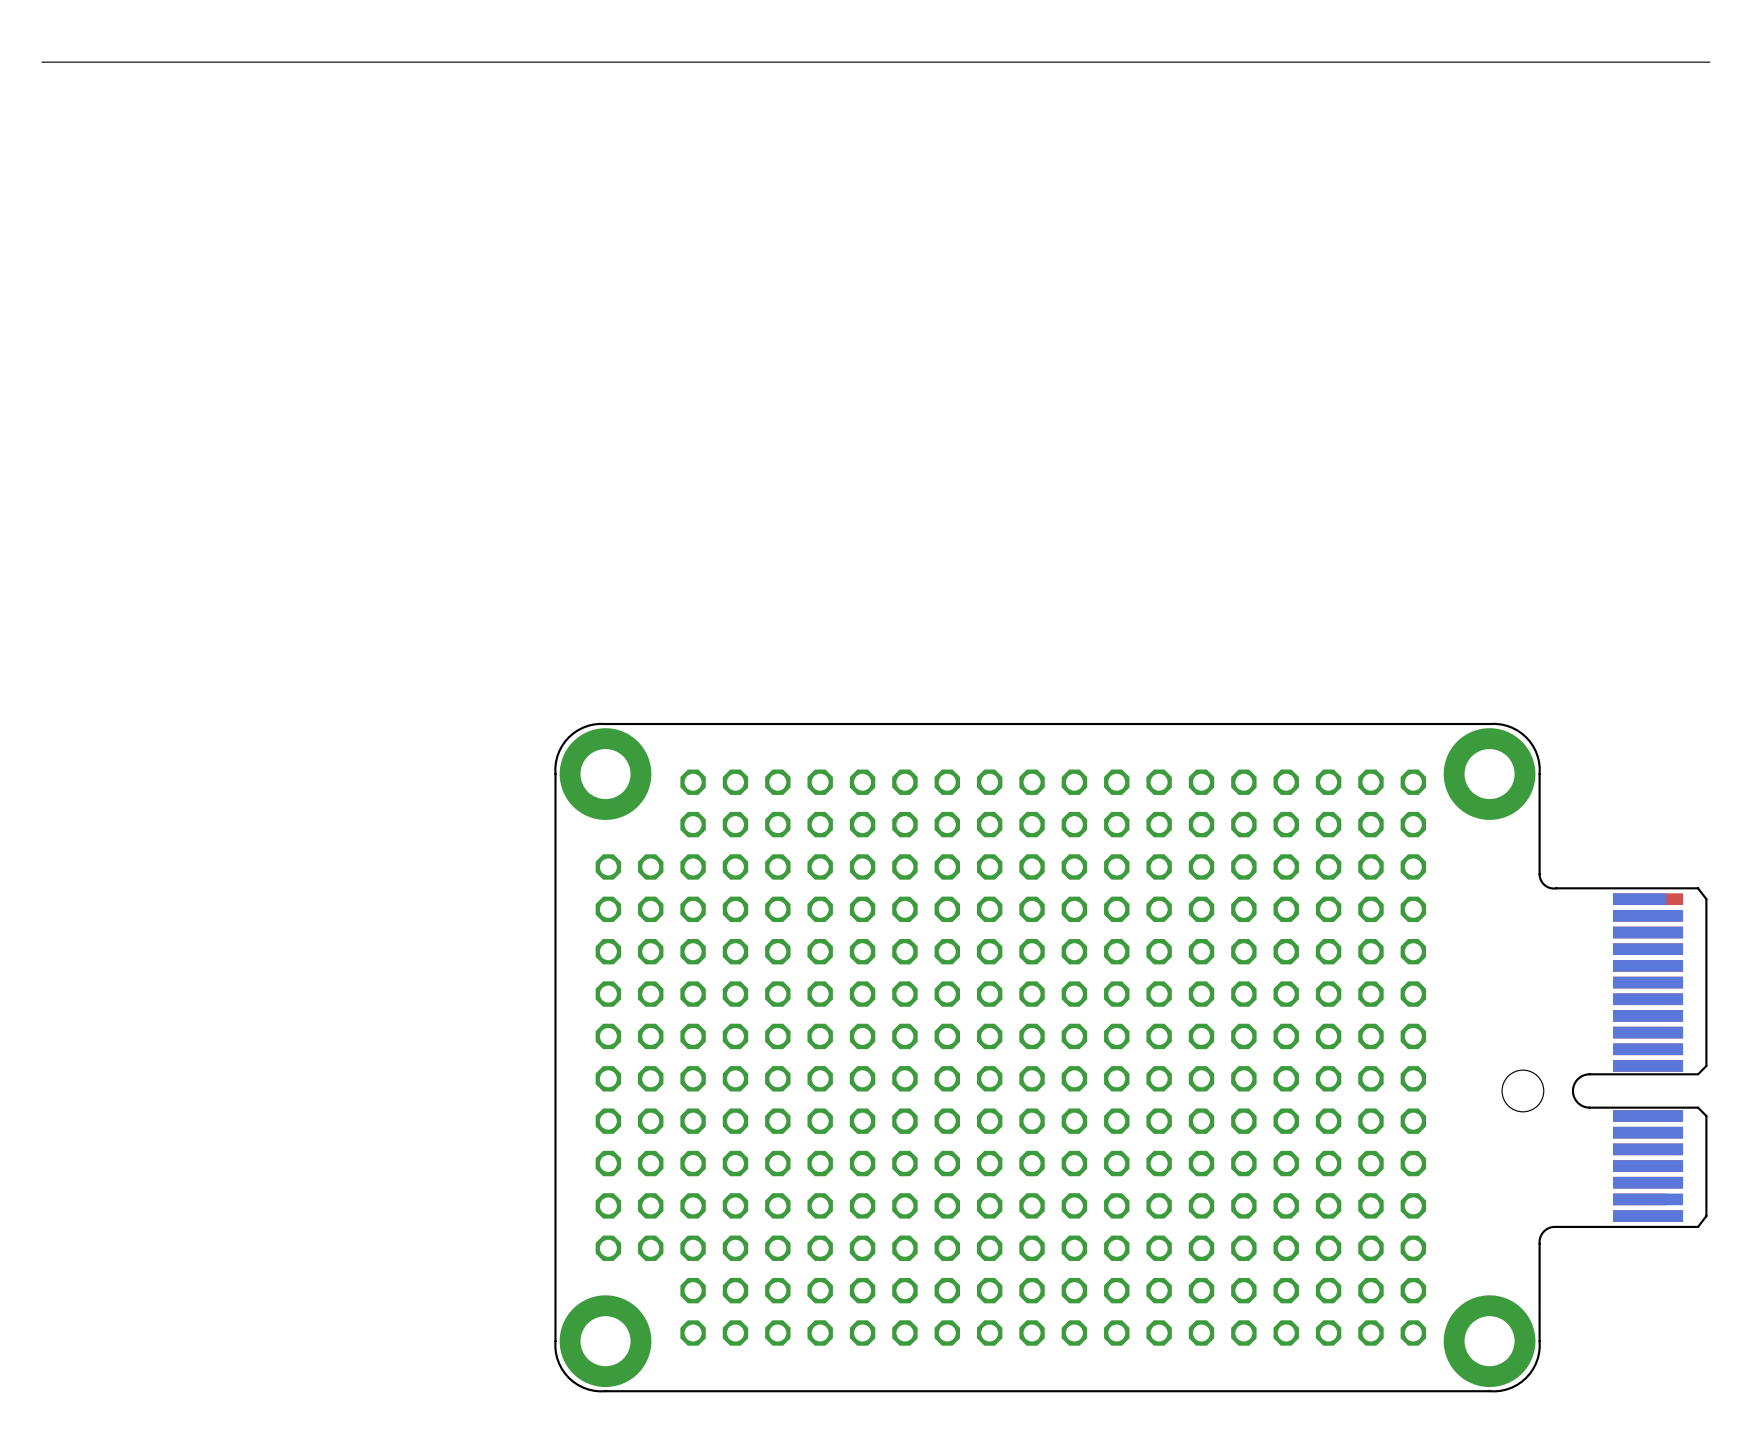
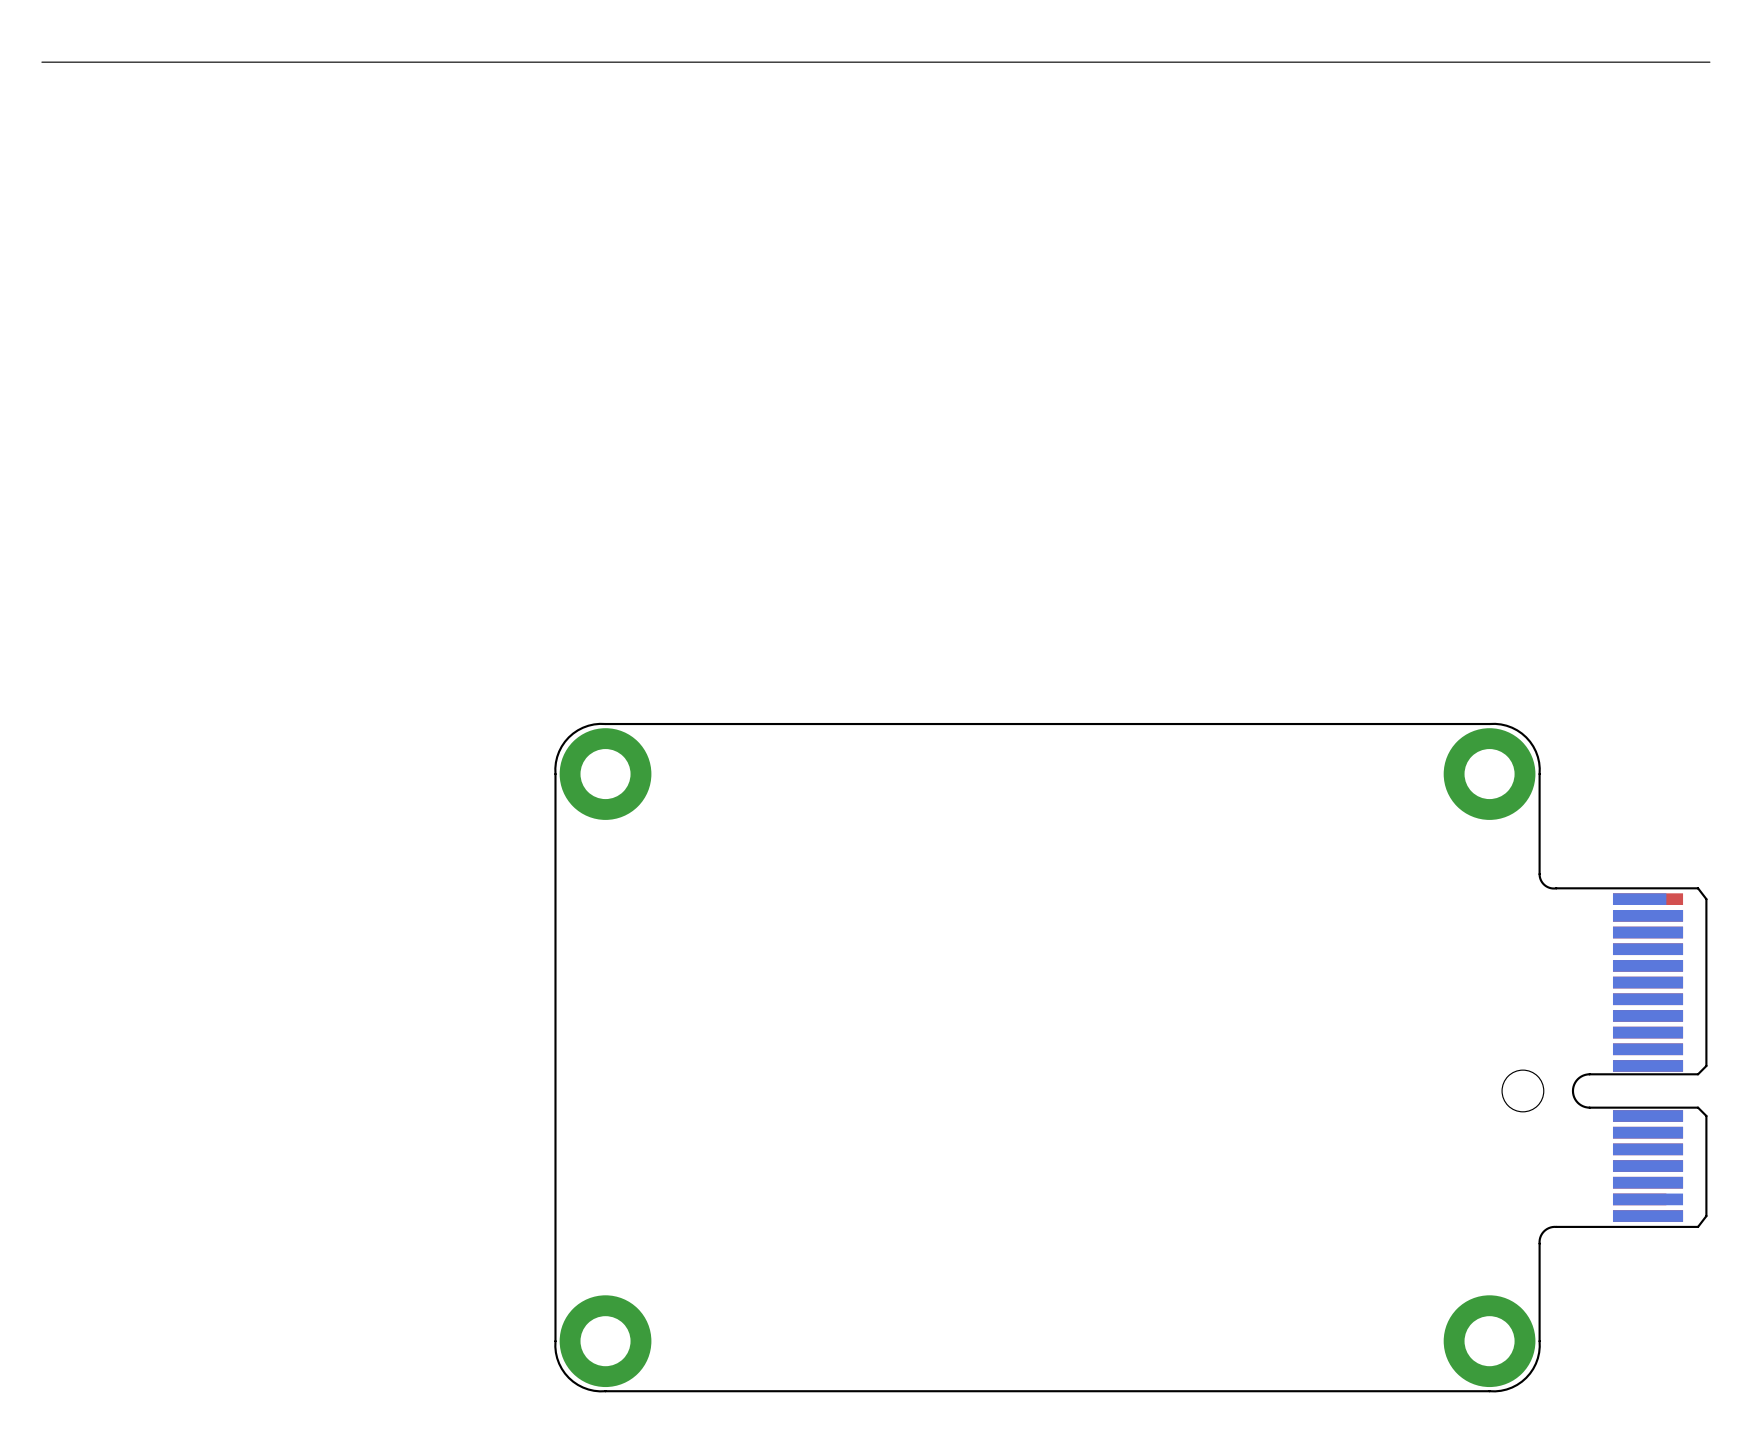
part: (629, 1057) -> none
part: (714, 1057) -> none
part: (799, 1057) -> none
part: (883, 1057) -> none
part: (968, 1057) -> none
part: (1053, 1057) -> none
part: (1137, 1057) -> none
part: (1222, 1057) -> none
part: (1307, 1057) -> none
part: (1392, 1057) -> none

